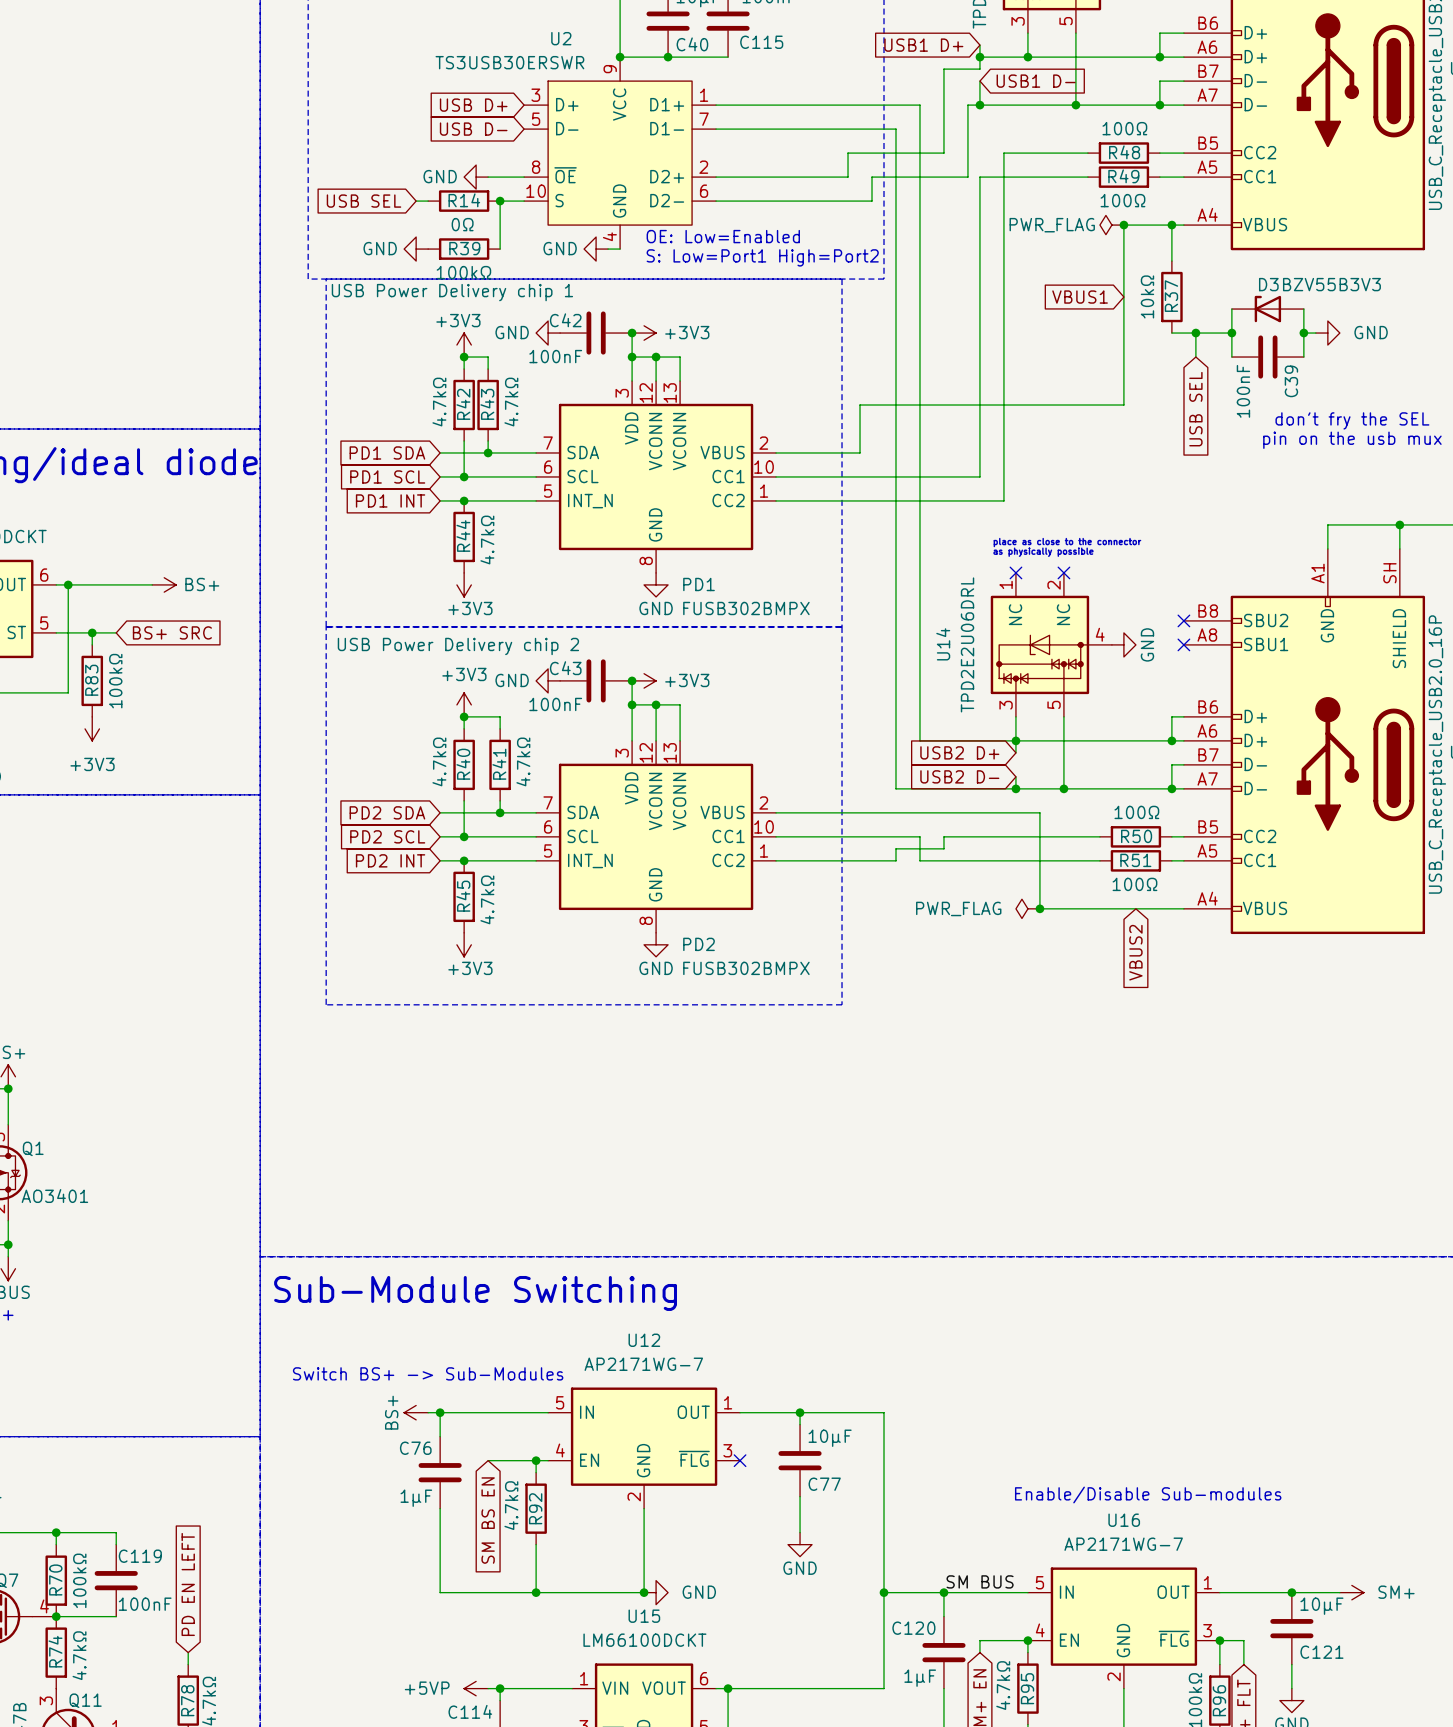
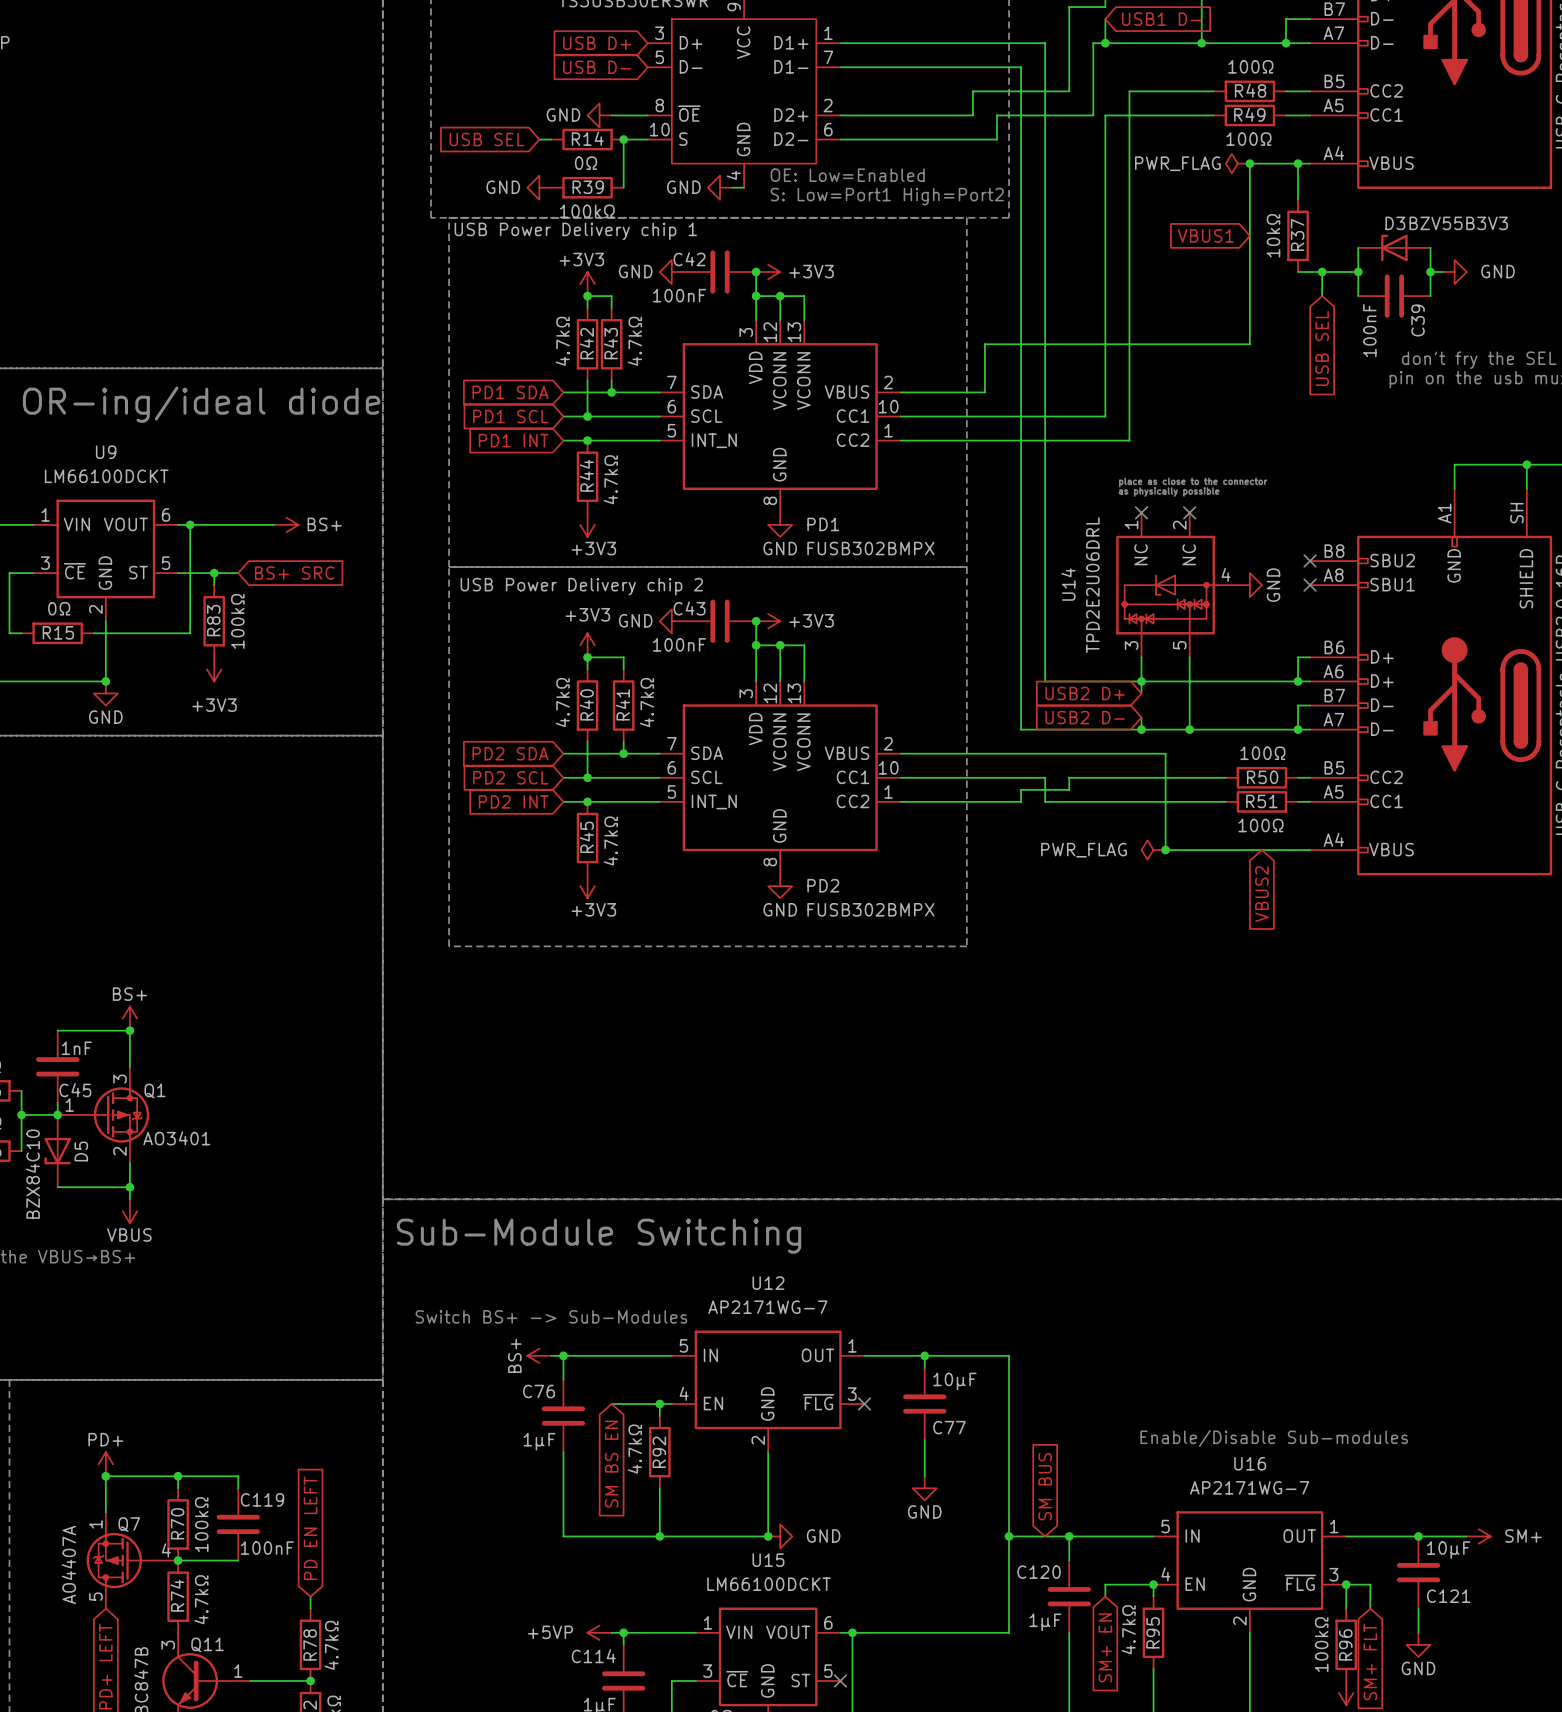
global label: none -> SM BUS (1045, 1486)
label: SM BUS (980, 1581) -> none

